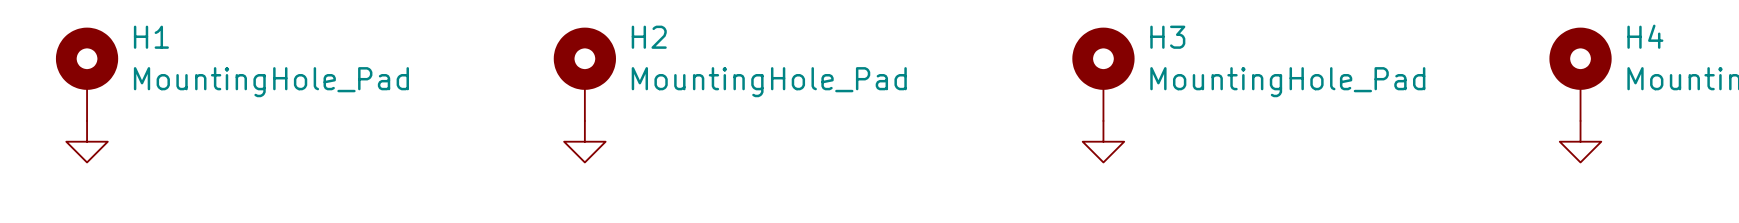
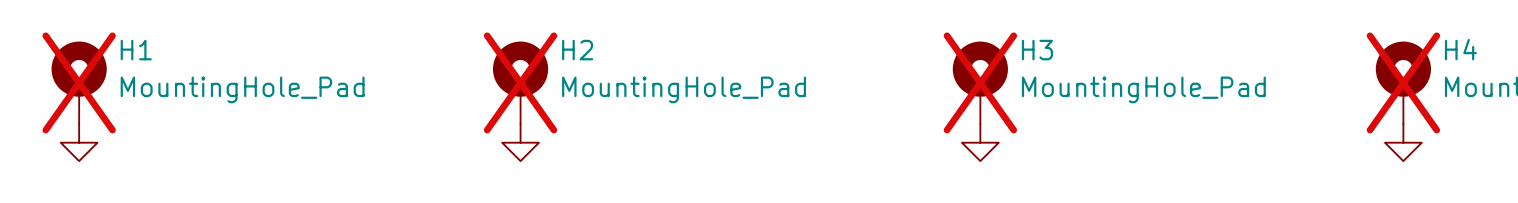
H1 do-not-place cross: none -> (79, 82)
H2 do-not-place cross: none -> (520, 82)
H3 do-not-place cross: none -> (980, 82)
H4 do-not-place cross: none -> (1403, 82)

